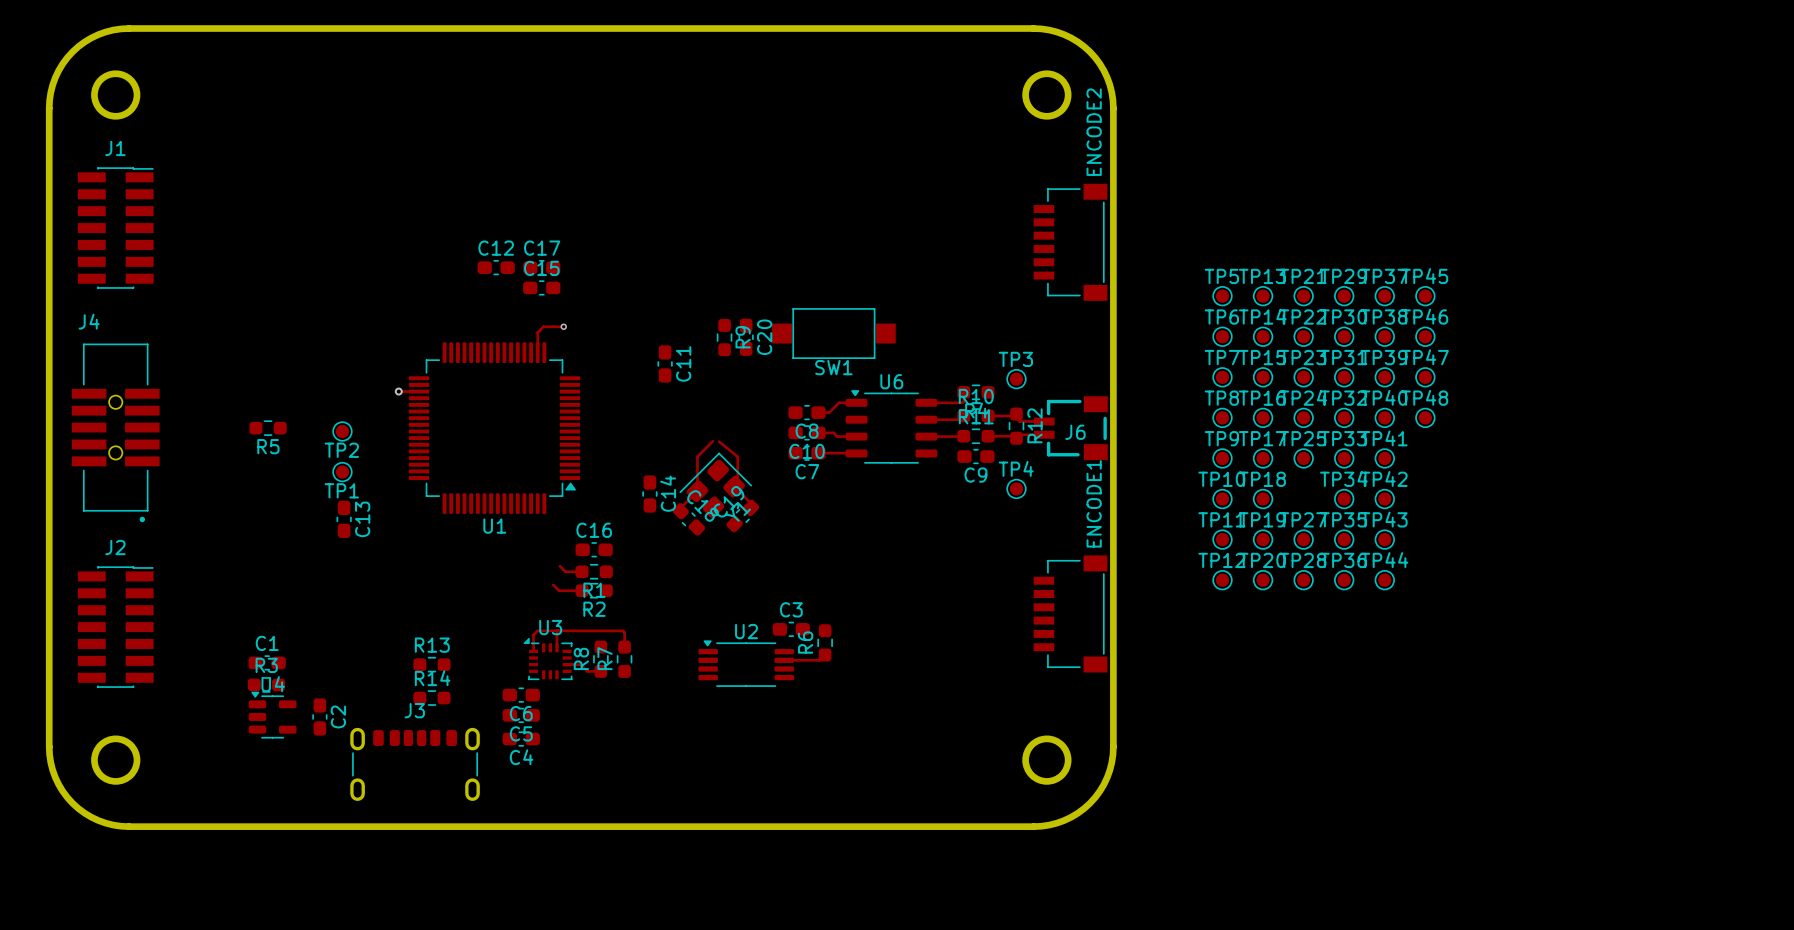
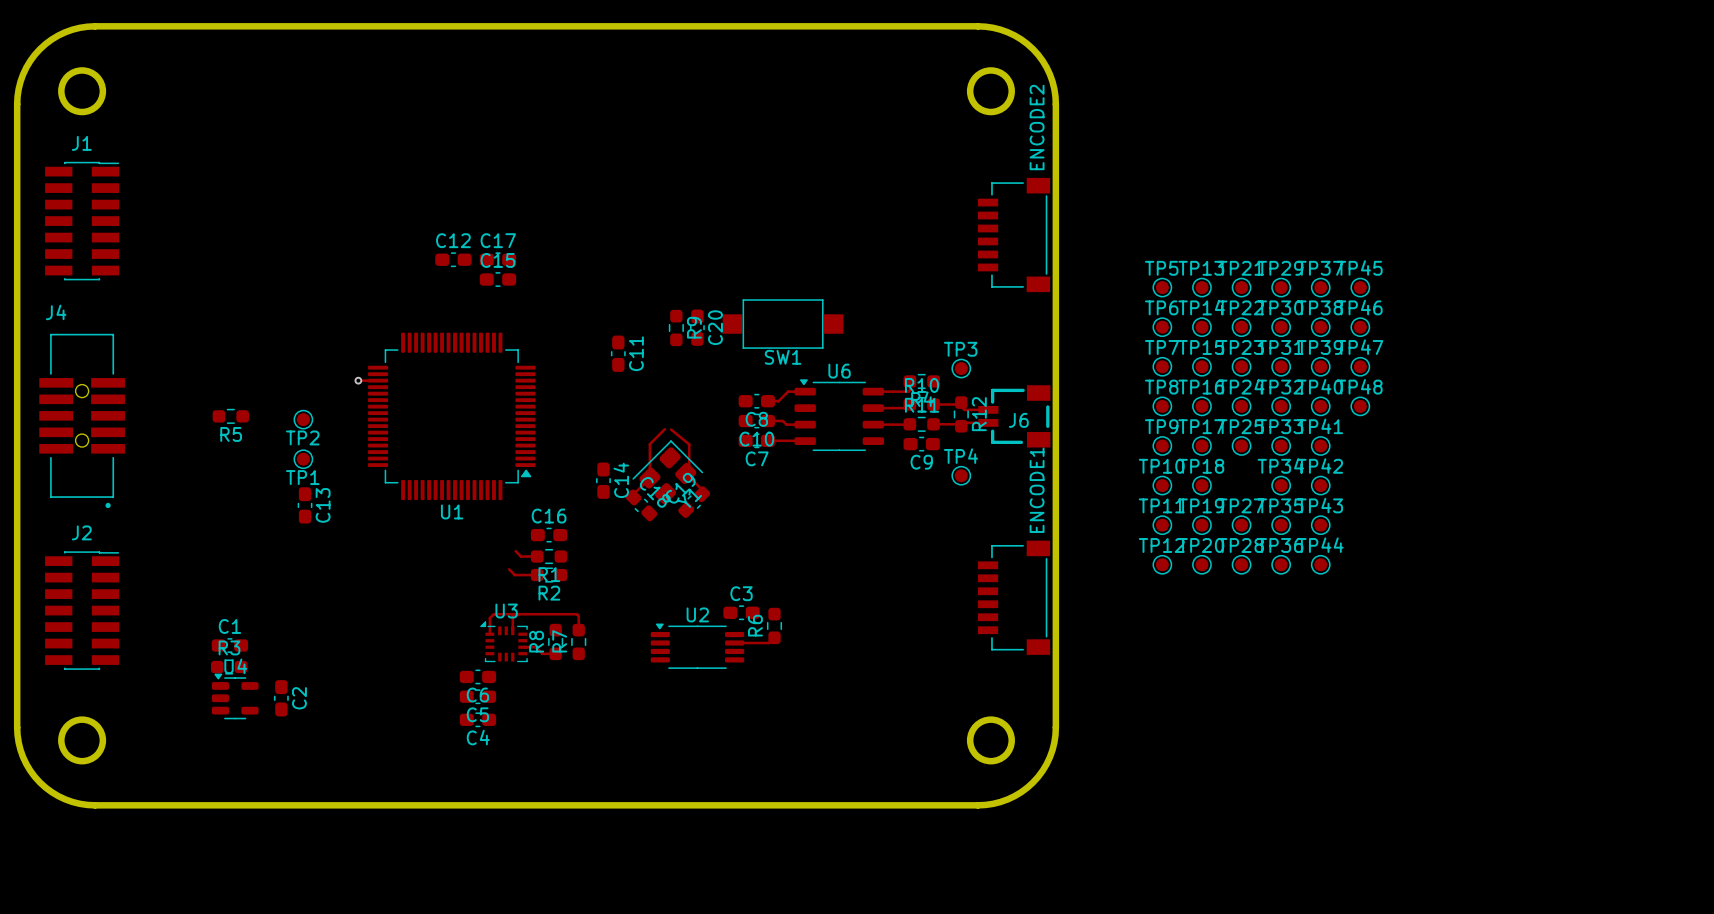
track: (563, 326) (543, 326) (537, 332) (537, 352) -> none
via: (563, 326) -> none
R13: (431, 664) -> none
R14: (431, 698) -> none
J3: (415, 764) -> none

